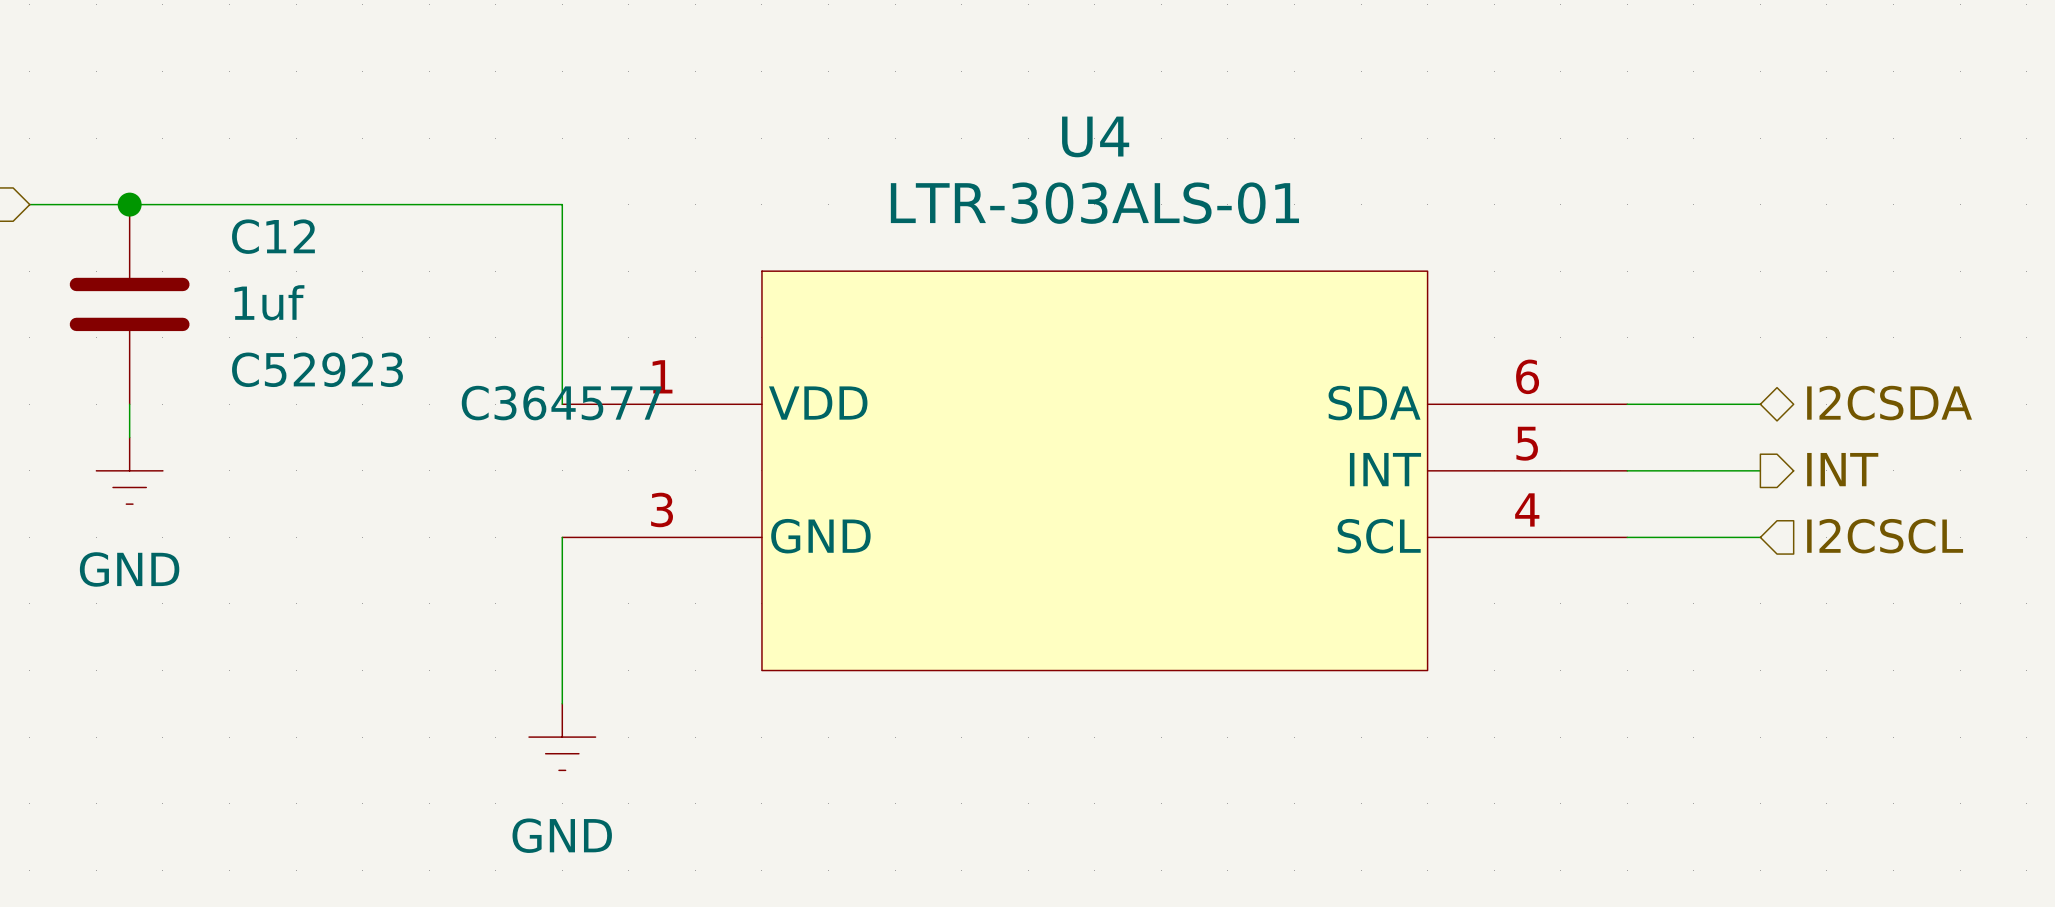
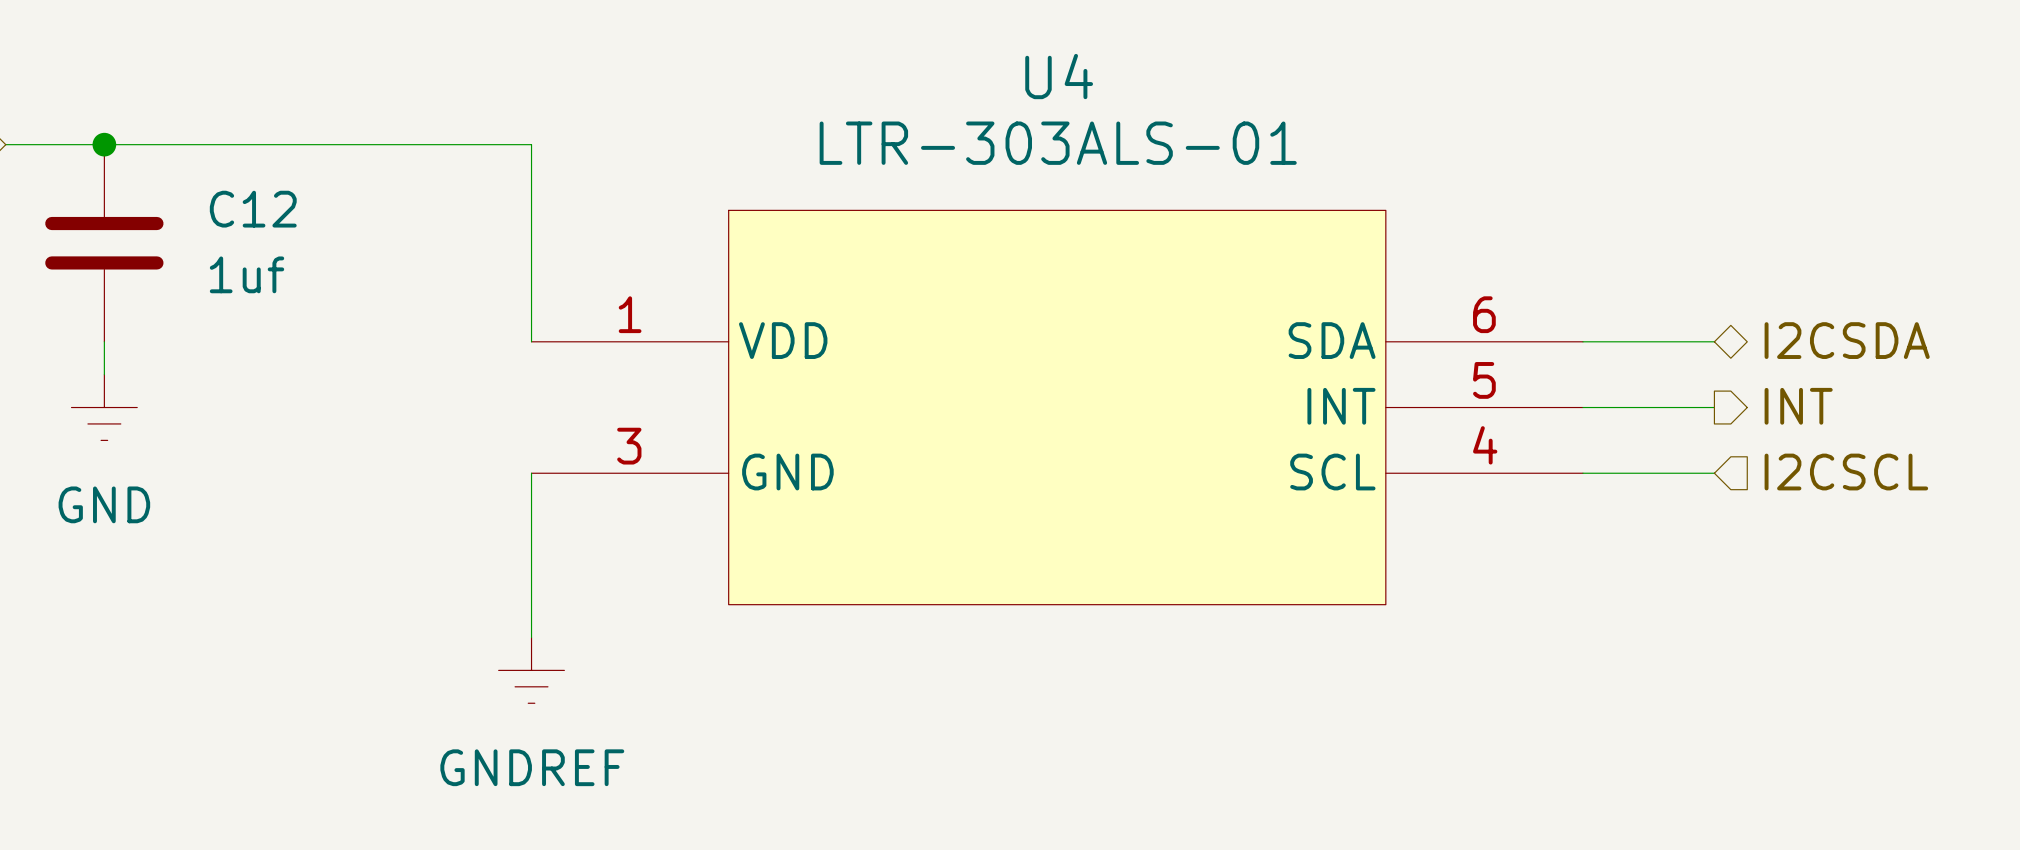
C12 name position: C12 (273, 236) -> C12 (253, 209)
C12 value position: 1uf (269, 302) -> 1uf (247, 274)
C12 text: C52923 (317, 369) -> none
U4 text: C364577 (561, 403) -> none
power symbol: GND (562, 737) -> GNDREF (531, 670)

